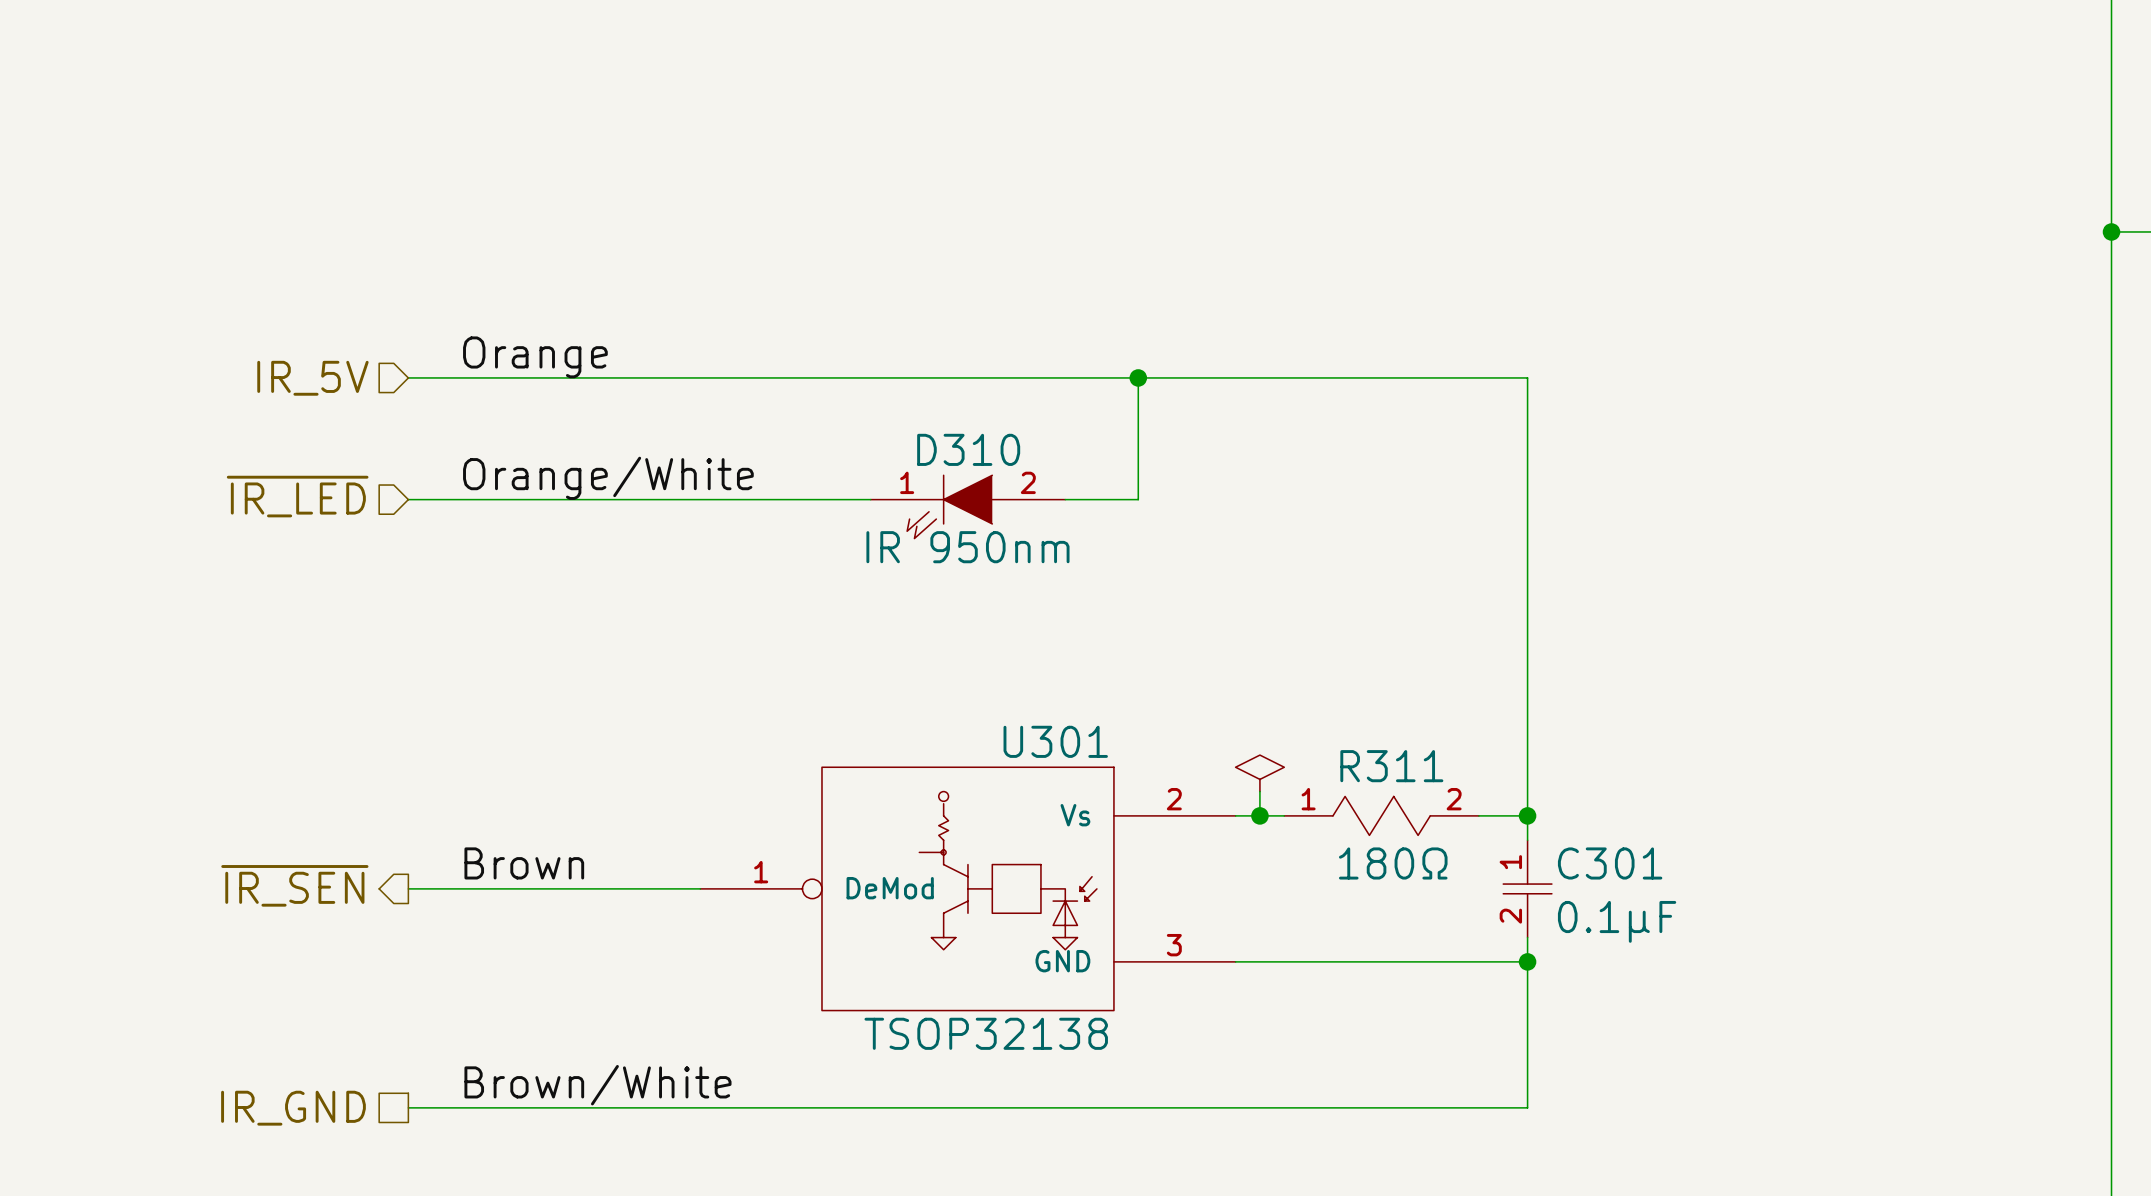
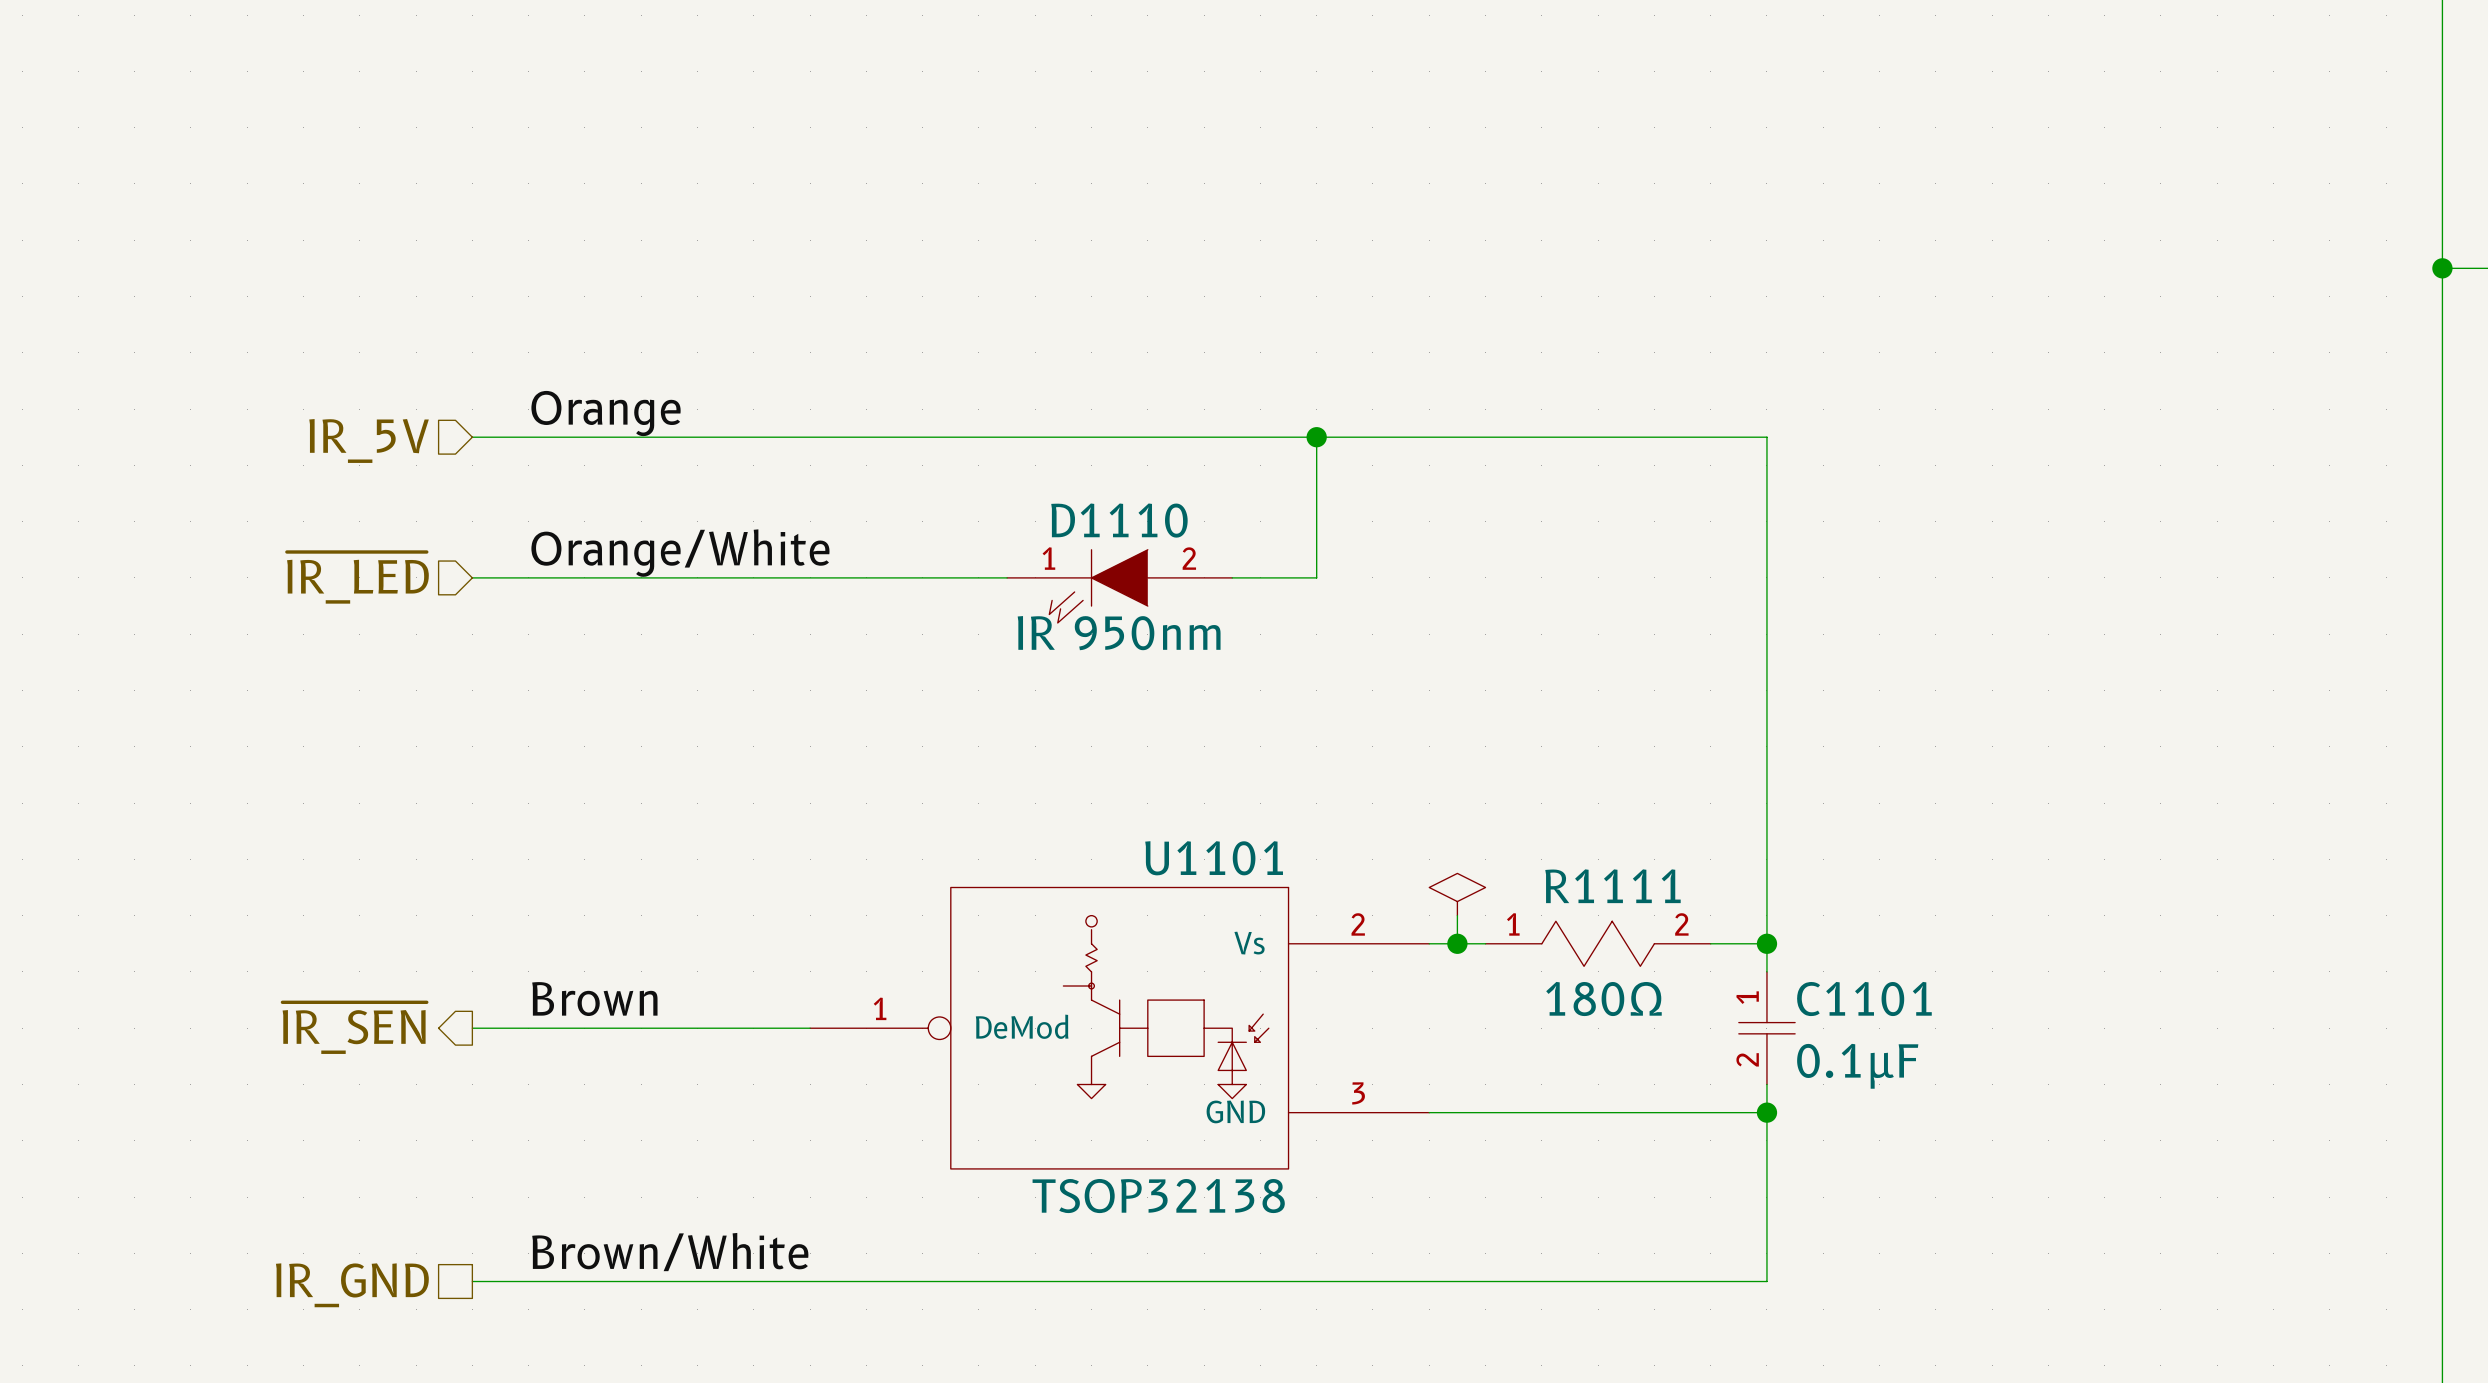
D310 name: D310 (968, 449) -> D1110 (1119, 520)
U301 name: U301 (1055, 741) -> U1101 (1214, 858)
R311 name: R311 (1391, 766) -> R1111 (1612, 886)
C301 name: C301 (1610, 863) -> C1101 (1864, 999)

